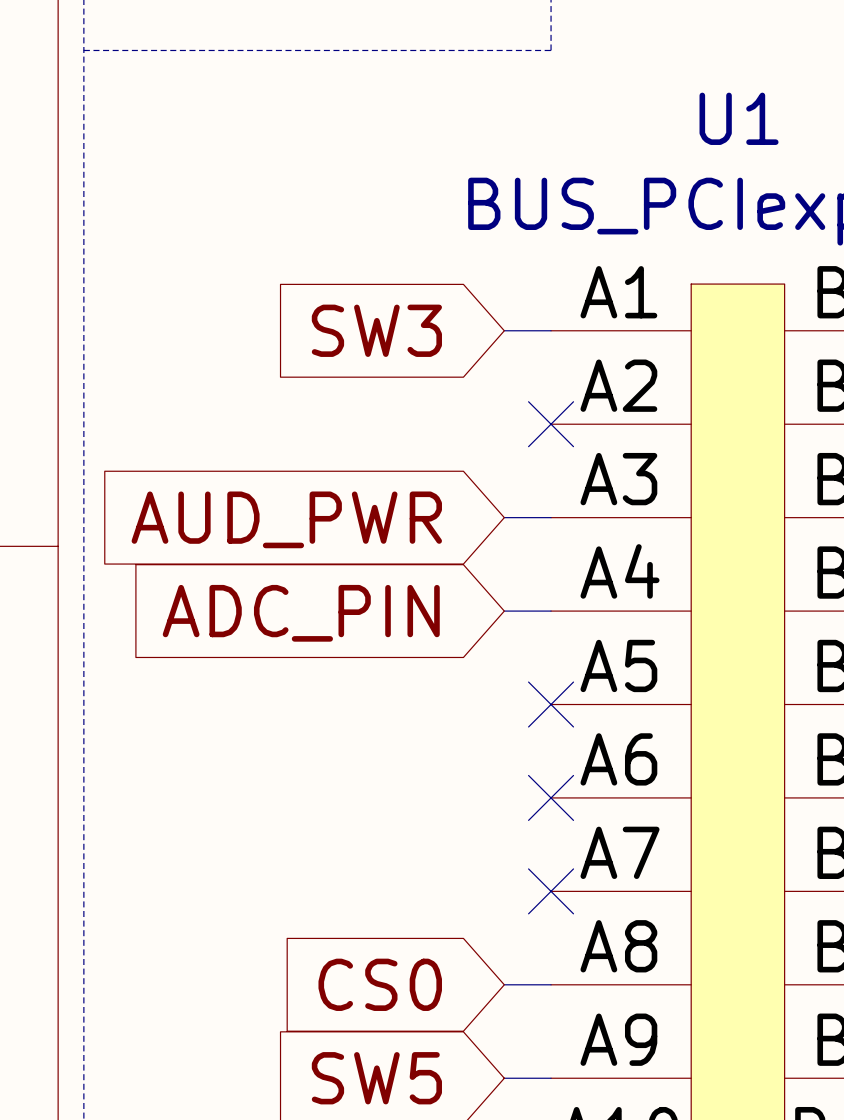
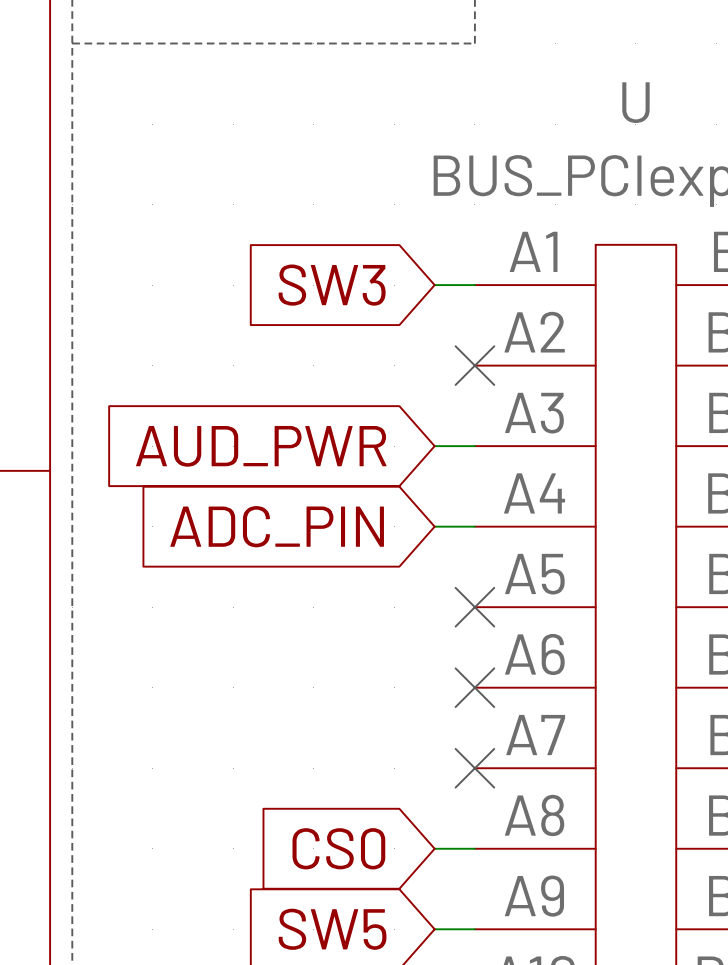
U1 name: U1 (739, 118) -> U (635, 102)

